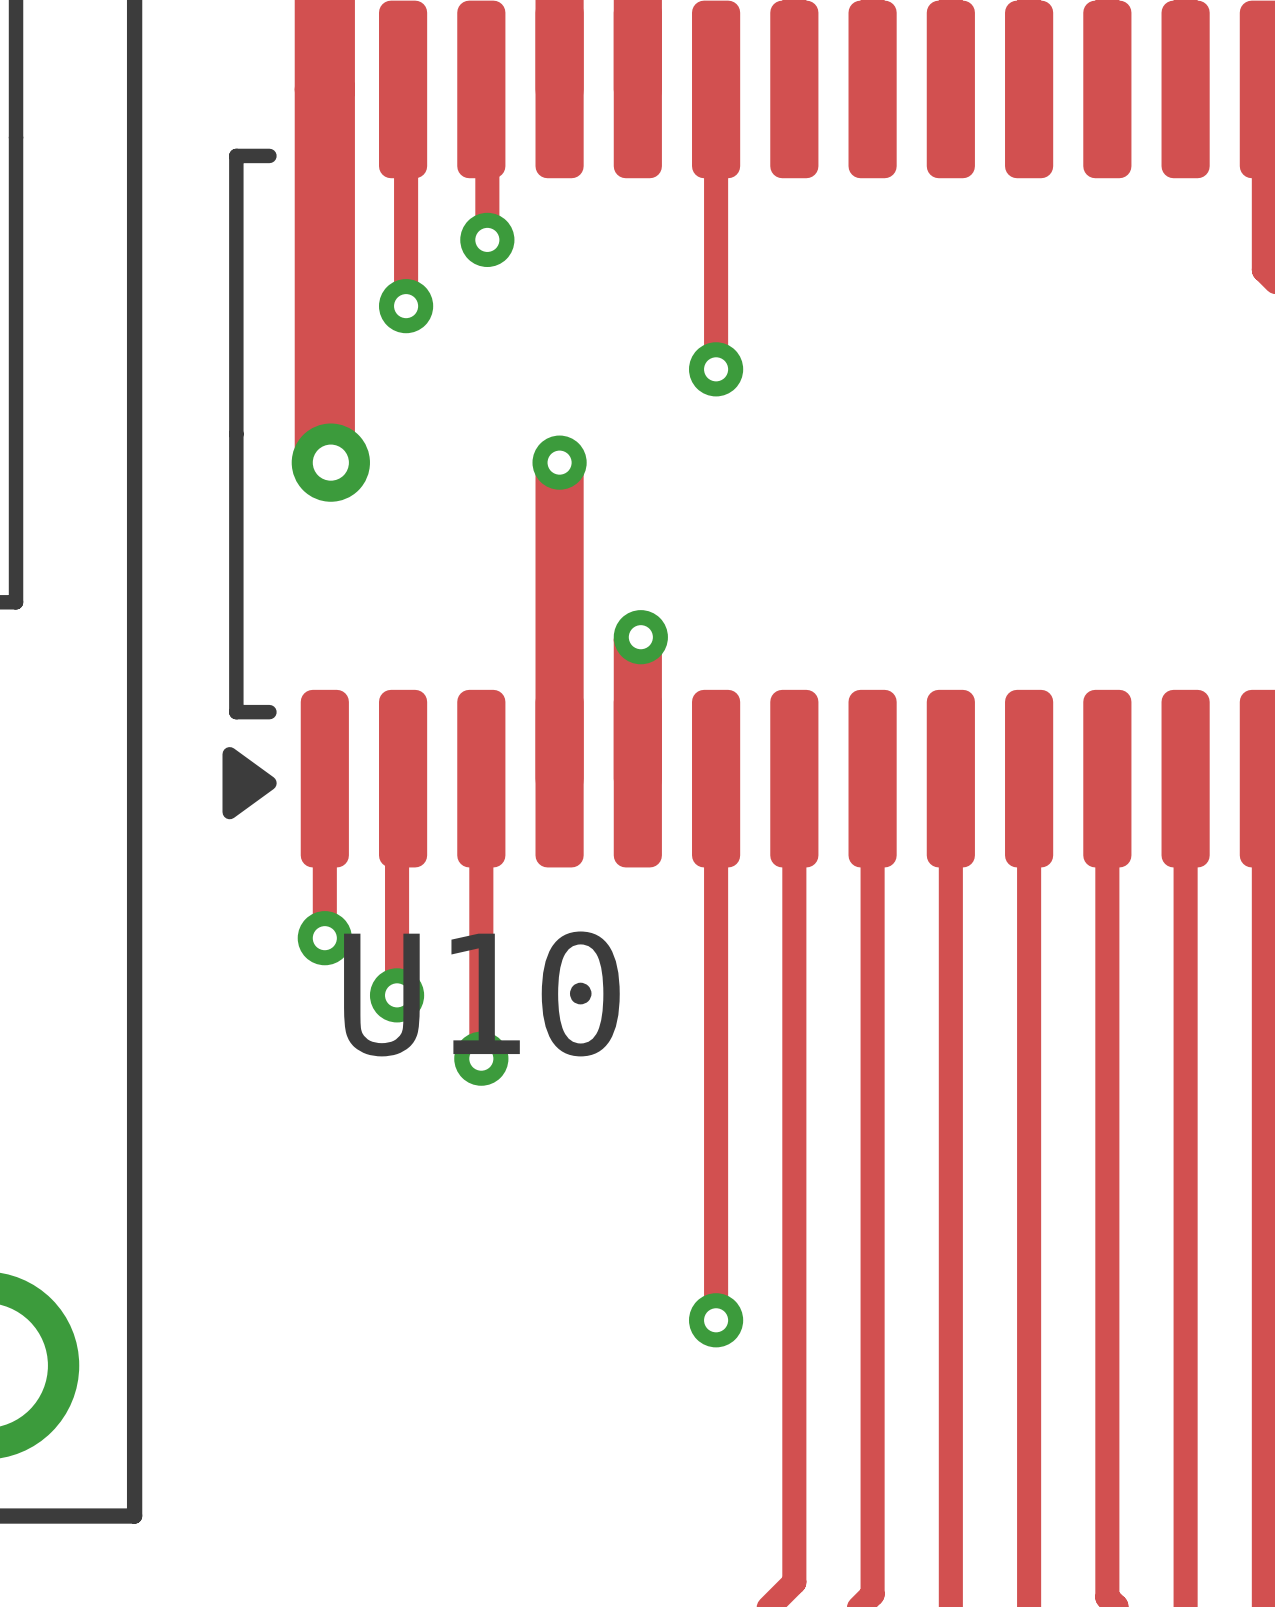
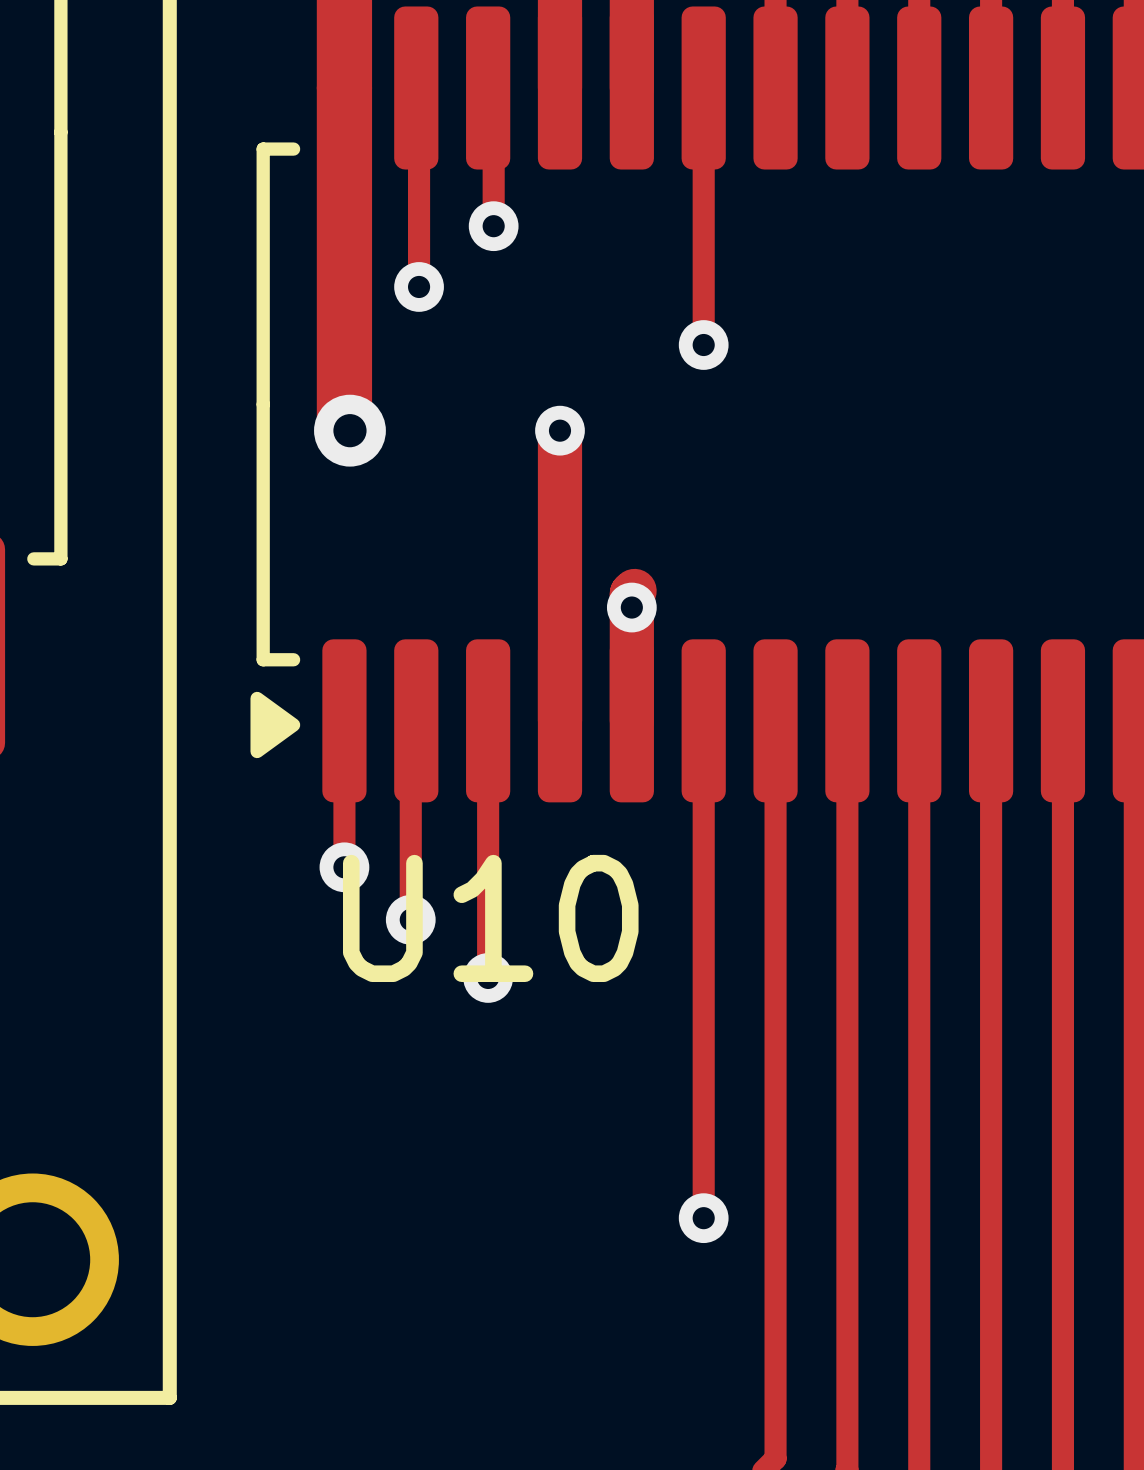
via position: (640, 637) -> (631, 607)

